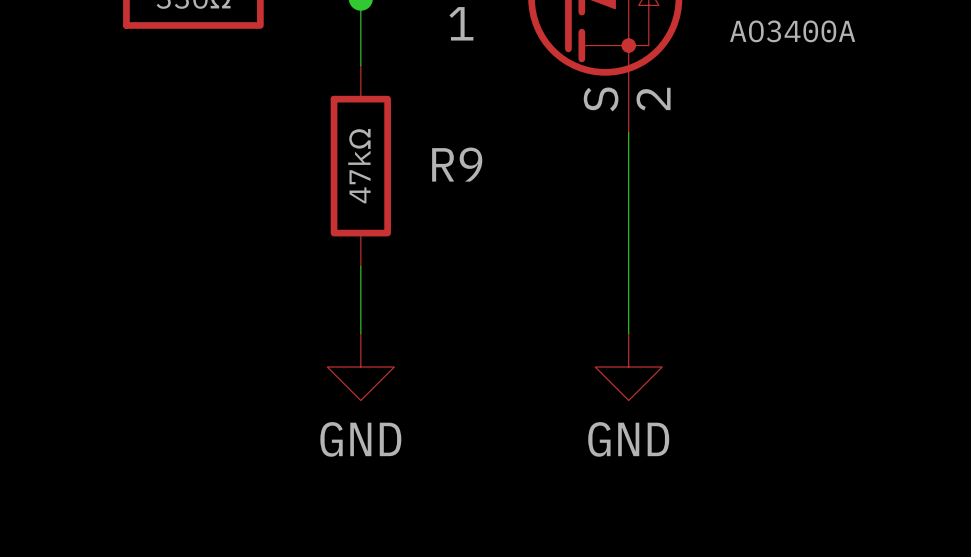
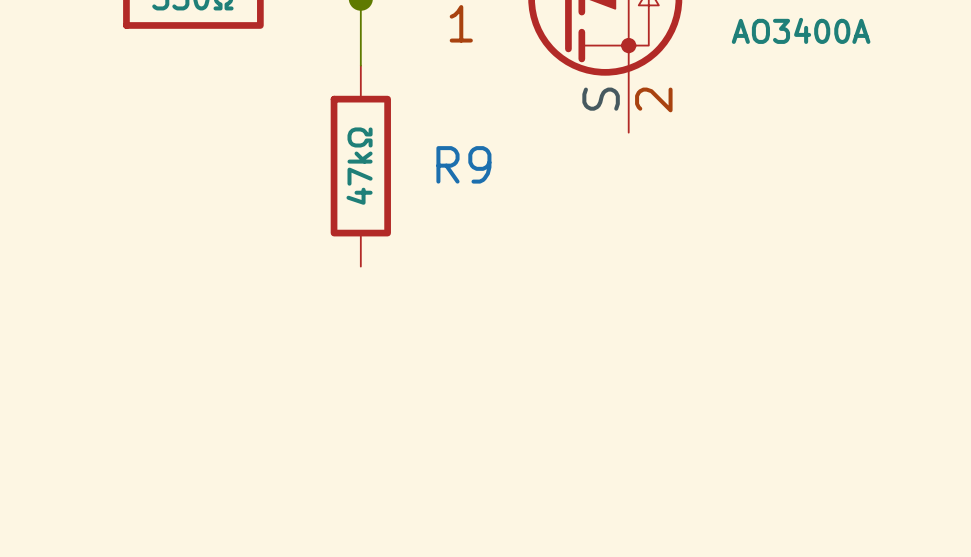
wire: (628, 132) (628, 333) -> none
wire: (360, 266) (360, 333) -> none
power symbol: GND (360, 367) -> none
power symbol: GND (628, 367) -> none

